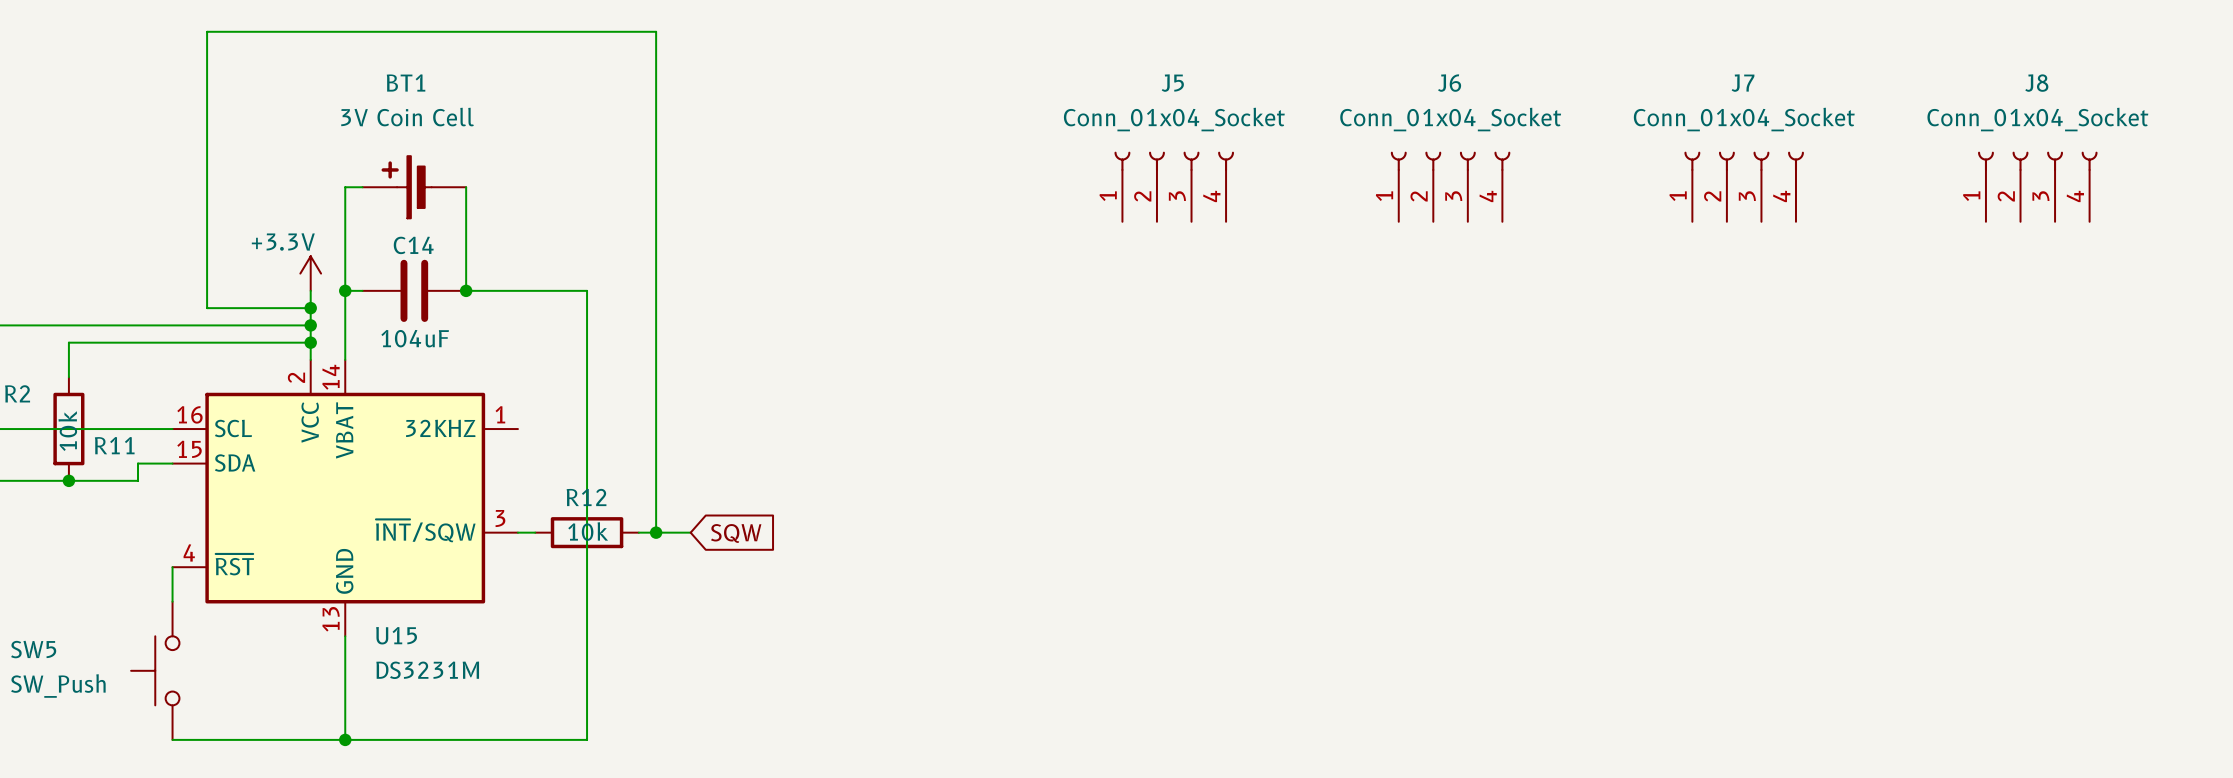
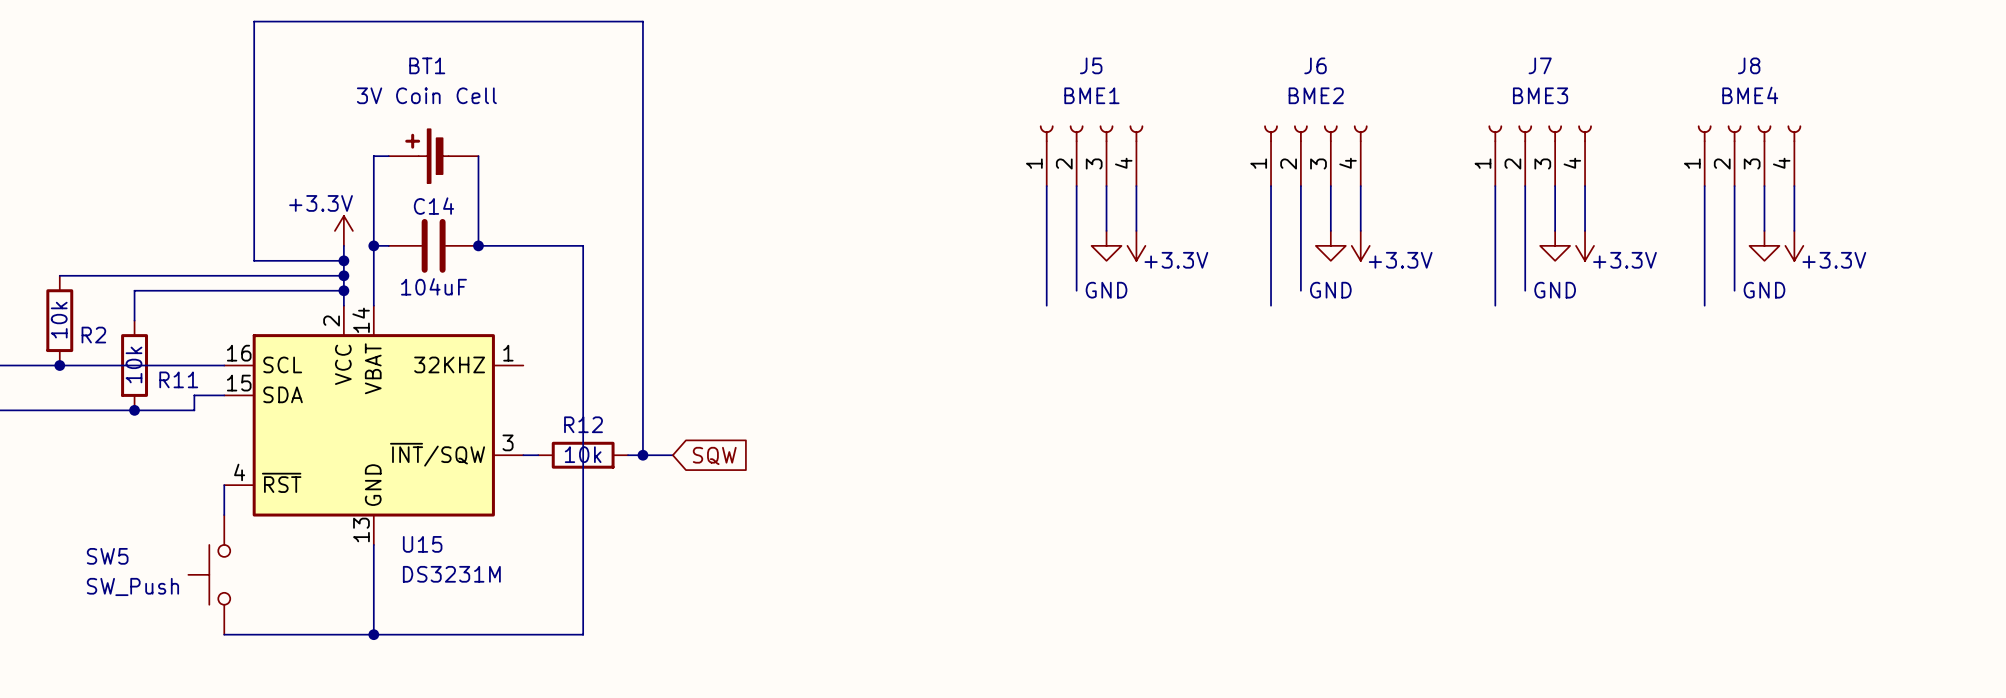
J5 value: Conn_01x04_Socket (1174, 119) -> BME1 (1091, 95)
J6 value: Conn_01x04_Socket (1450, 119) -> BME2 (1316, 95)
J7 value: Conn_01x04_Socket (1744, 119) -> BME3 (1540, 95)
J8 value: Conn_01x04_Socket (2037, 119) -> BME4 (1750, 95)
J6 position: (1450, 186) -> (1315, 155)
J7 position: (1744, 186) -> (1540, 155)
J8 position: (2037, 186) -> (1749, 155)
wire: none -> (1046, 186) (1046, 305)
wire: none -> (1076, 186) (1076, 290)
wire: none -> (1106, 186) (1106, 230)
wire: none -> (1136, 186) (1136, 230)
wire: none -> (1271, 186) (1271, 305)
wire: none -> (1300, 186) (1300, 290)
wire: none -> (1330, 186) (1330, 230)
wire: none -> (1360, 186) (1360, 230)
wire: none -> (1495, 186) (1495, 305)
wire: none -> (1525, 186) (1525, 290)
wire: none -> (1555, 186) (1555, 230)
wire: none -> (1585, 186) (1585, 230)
wire: none -> (1704, 186) (1704, 305)
wire: none -> (1734, 186) (1734, 290)
wire: none -> (1764, 186) (1764, 230)
wire: none -> (1794, 186) (1794, 230)
power symbol: none -> GND (1106, 245)
power symbol: none -> +3.3V (1136, 245)
power symbol: none -> GND (1330, 245)
power symbol: none -> +3.3V (1360, 245)
power symbol: none -> GND (1555, 245)
power symbol: none -> +3.3V (1585, 245)
power symbol: none -> GND (1764, 245)
power symbol: none -> +3.3V (1794, 245)

